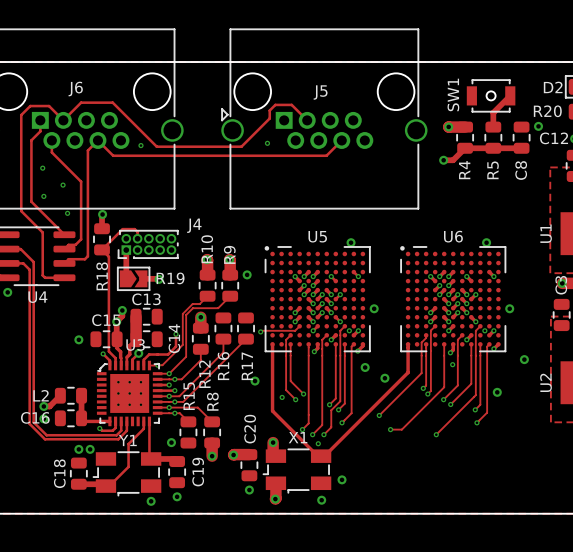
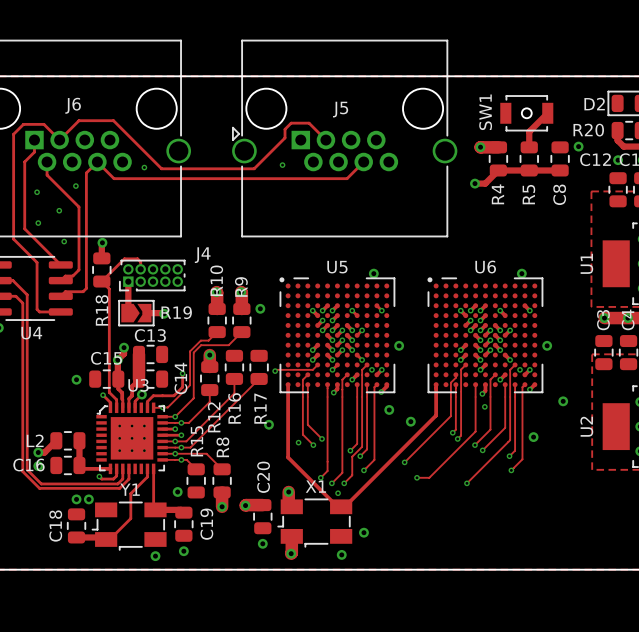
via: none -> (75, 186)

